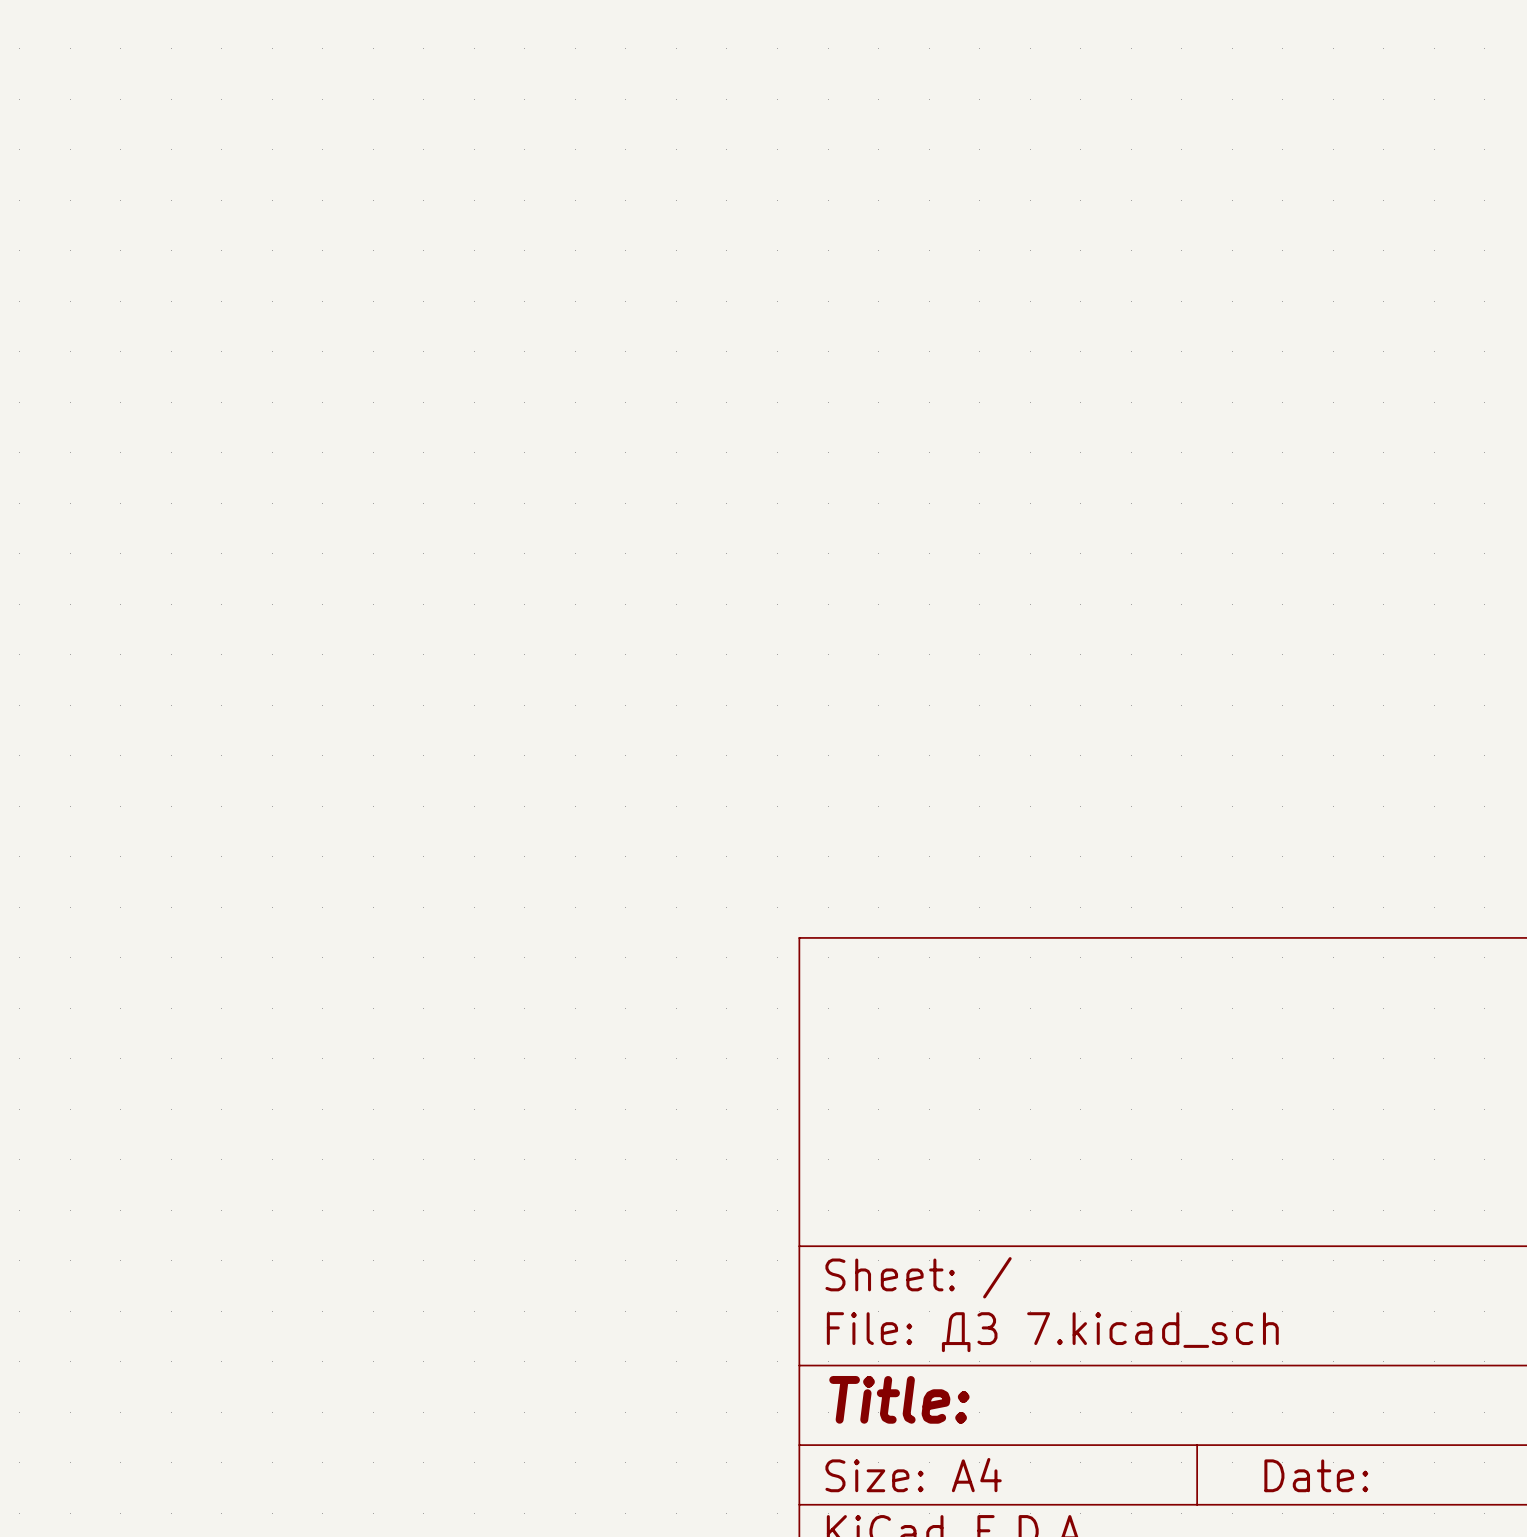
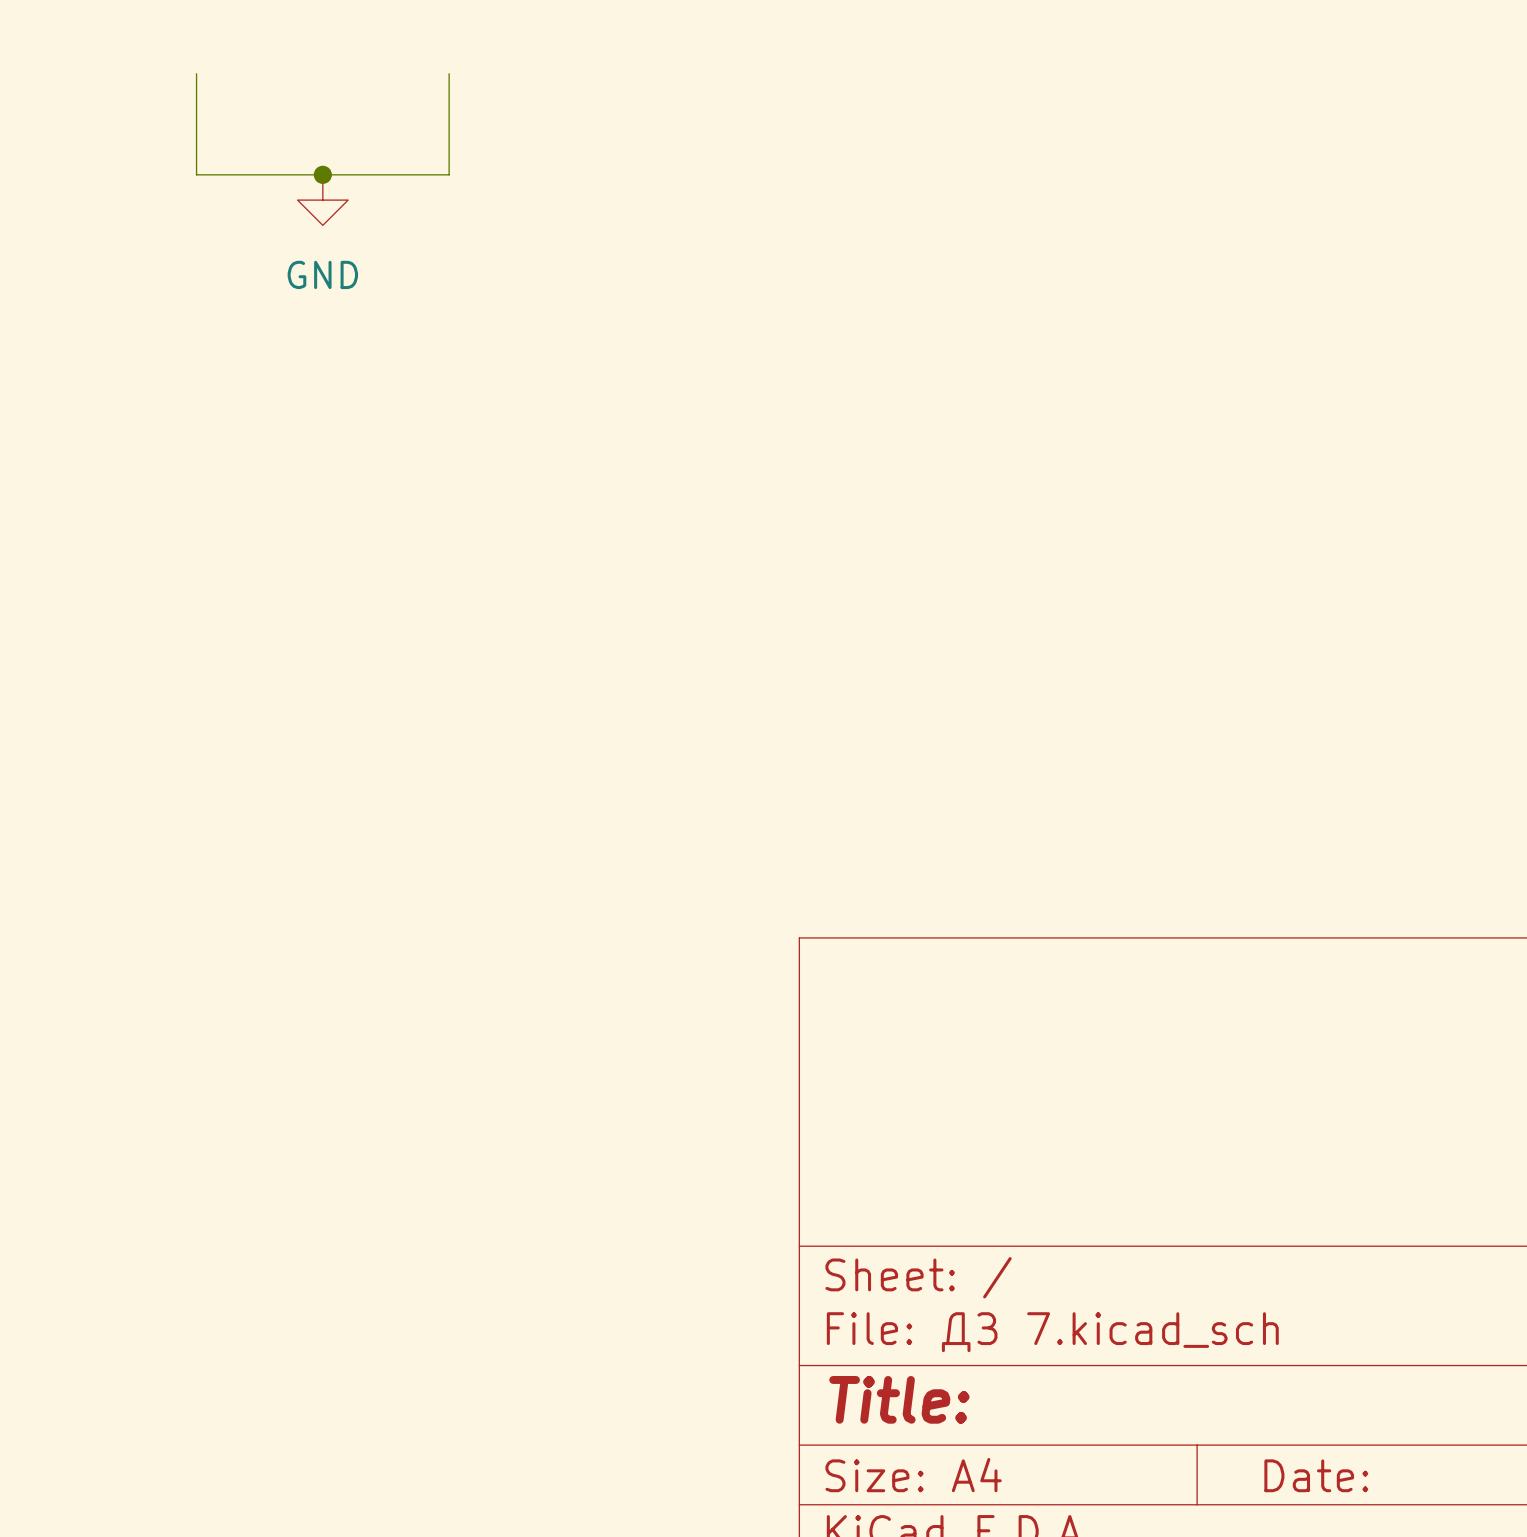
wire: none -> (196, 73) (196, 174) (449, 174) (449, 73)
junction: none -> (322, 174)
power symbol: none -> GND (322, 200)

